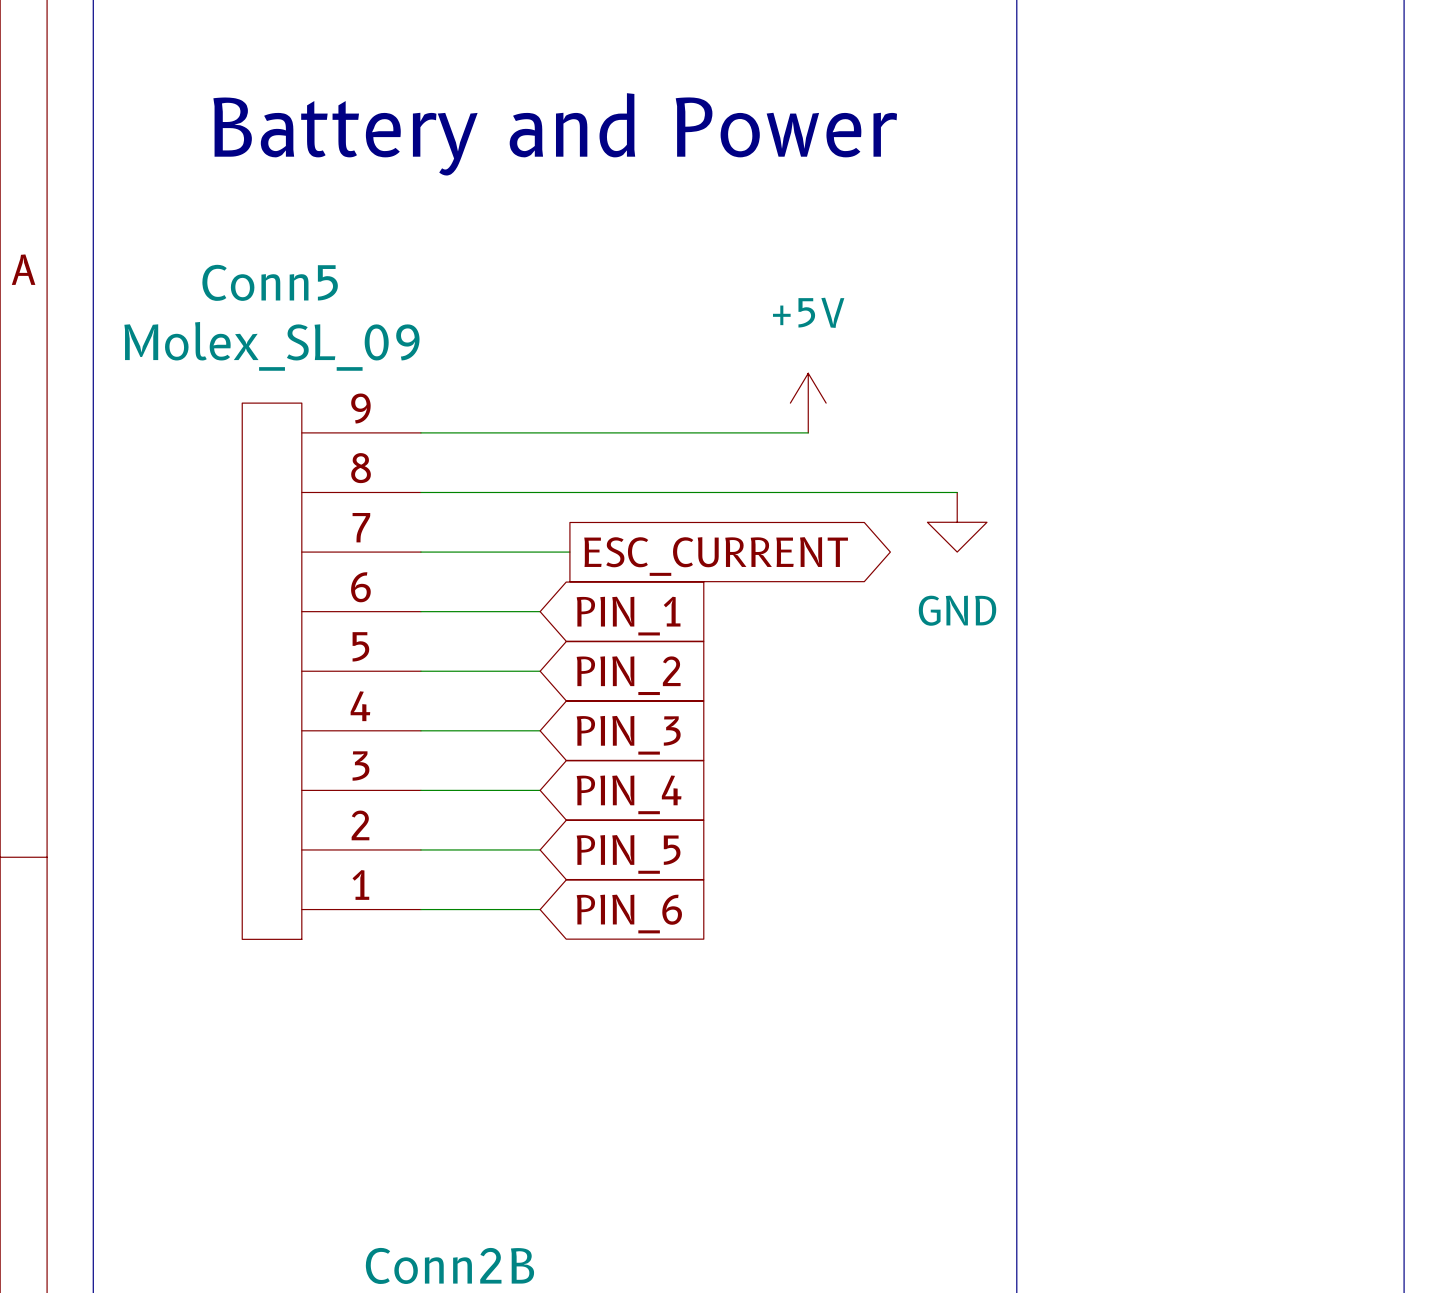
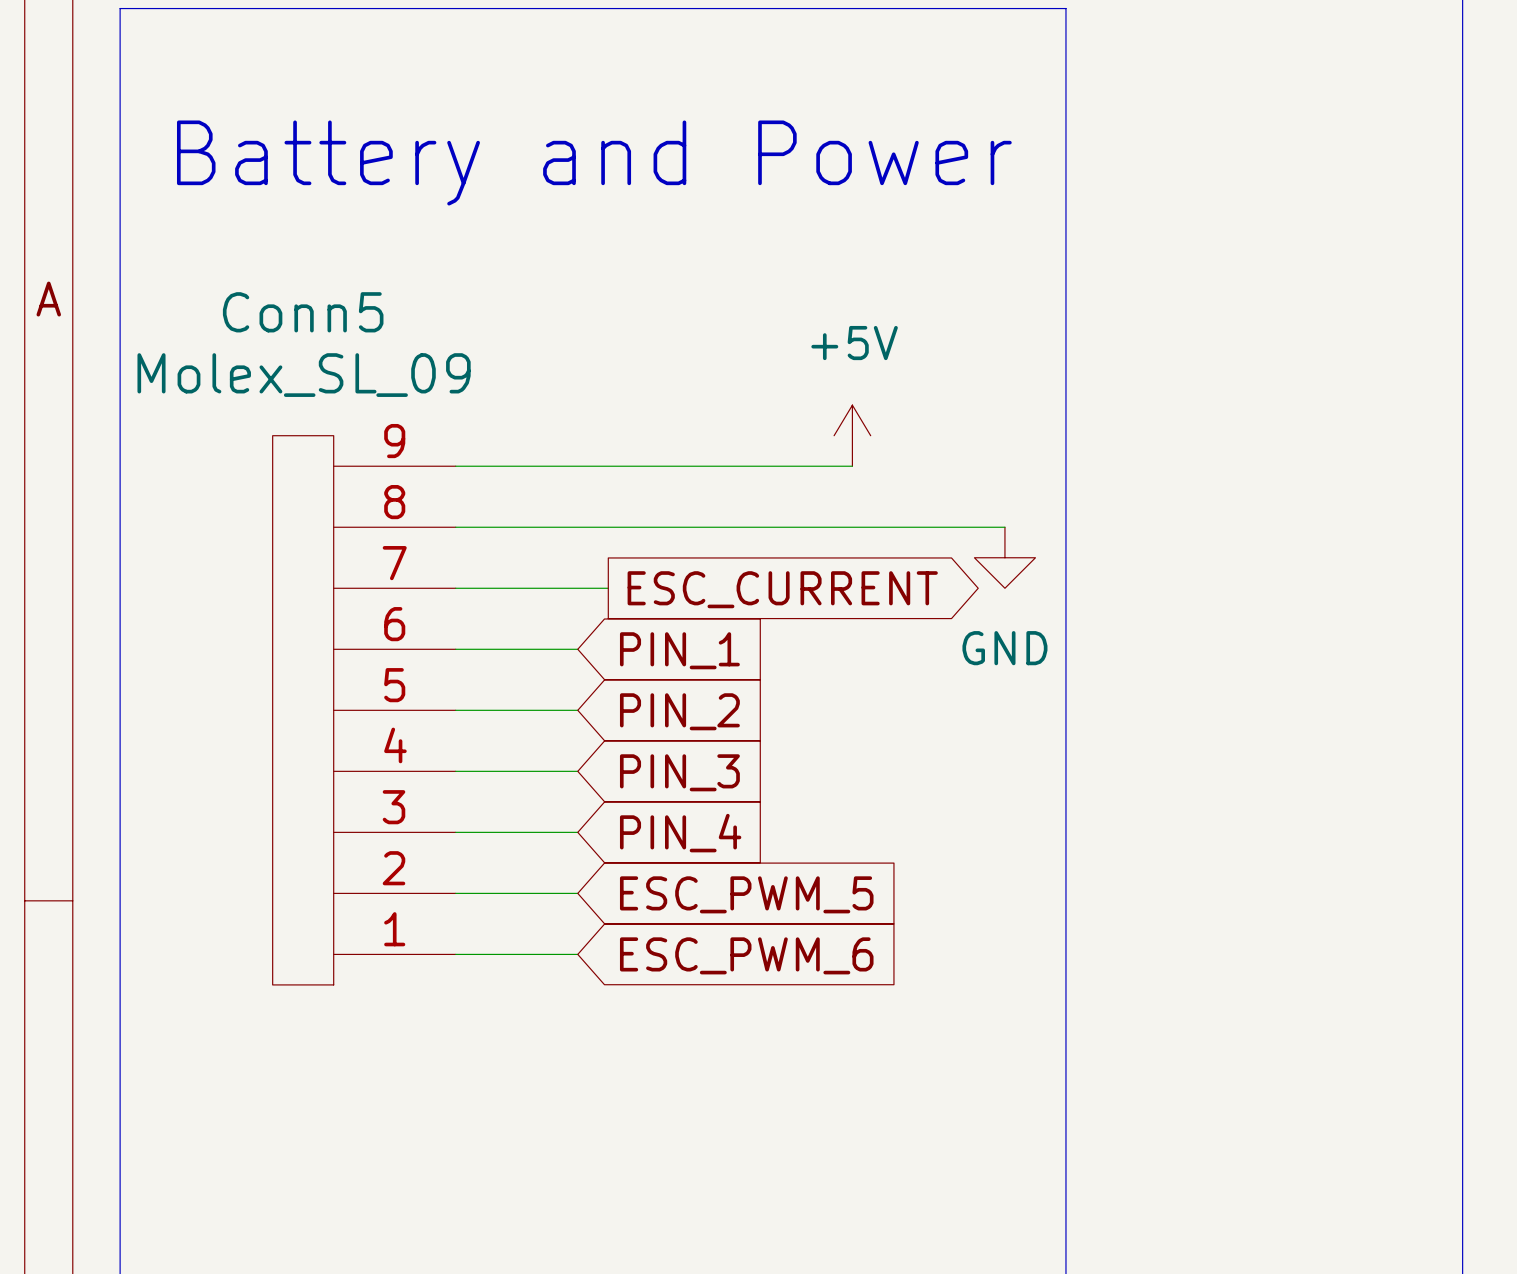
global label: PIN_5 (628, 854) -> ESC_PWM_5 (746, 894)
global label: PIN_6 (629, 914) -> ESC_PWM_6 (746, 955)

